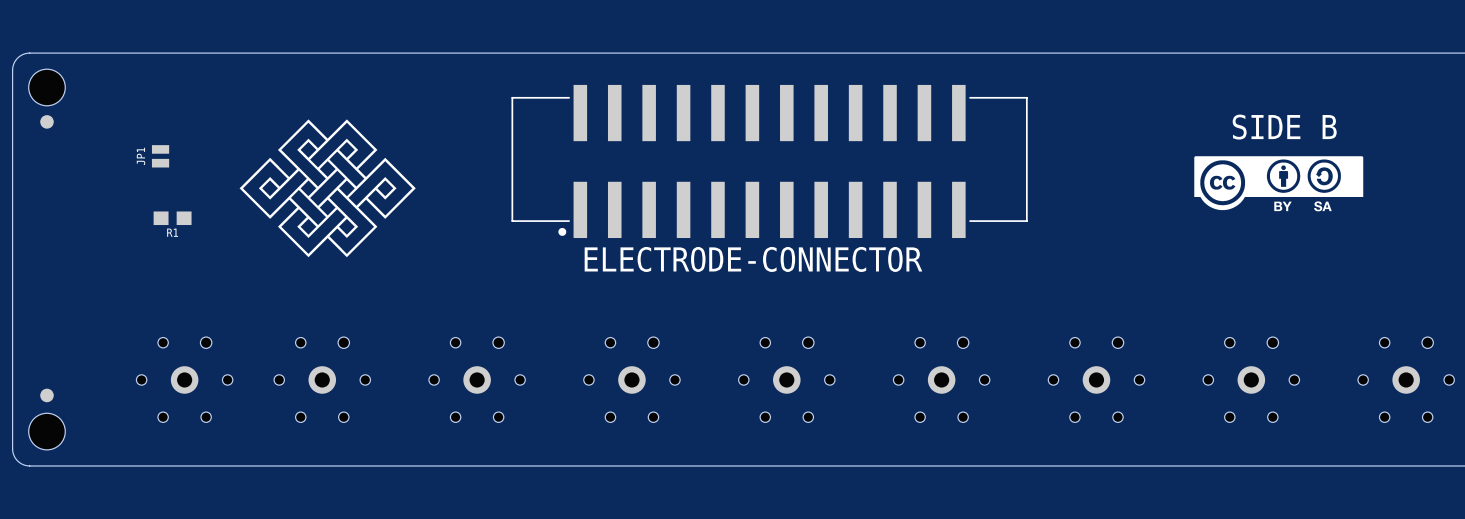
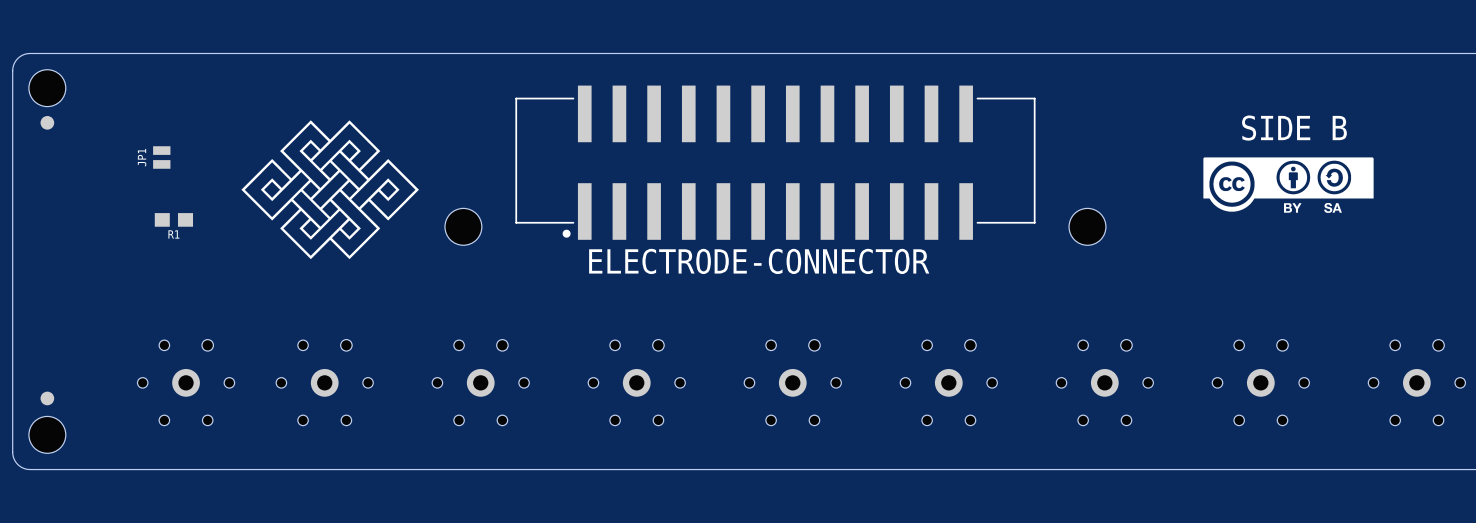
hole: none -> (463, 226)
hole: none -> (1087, 226)

